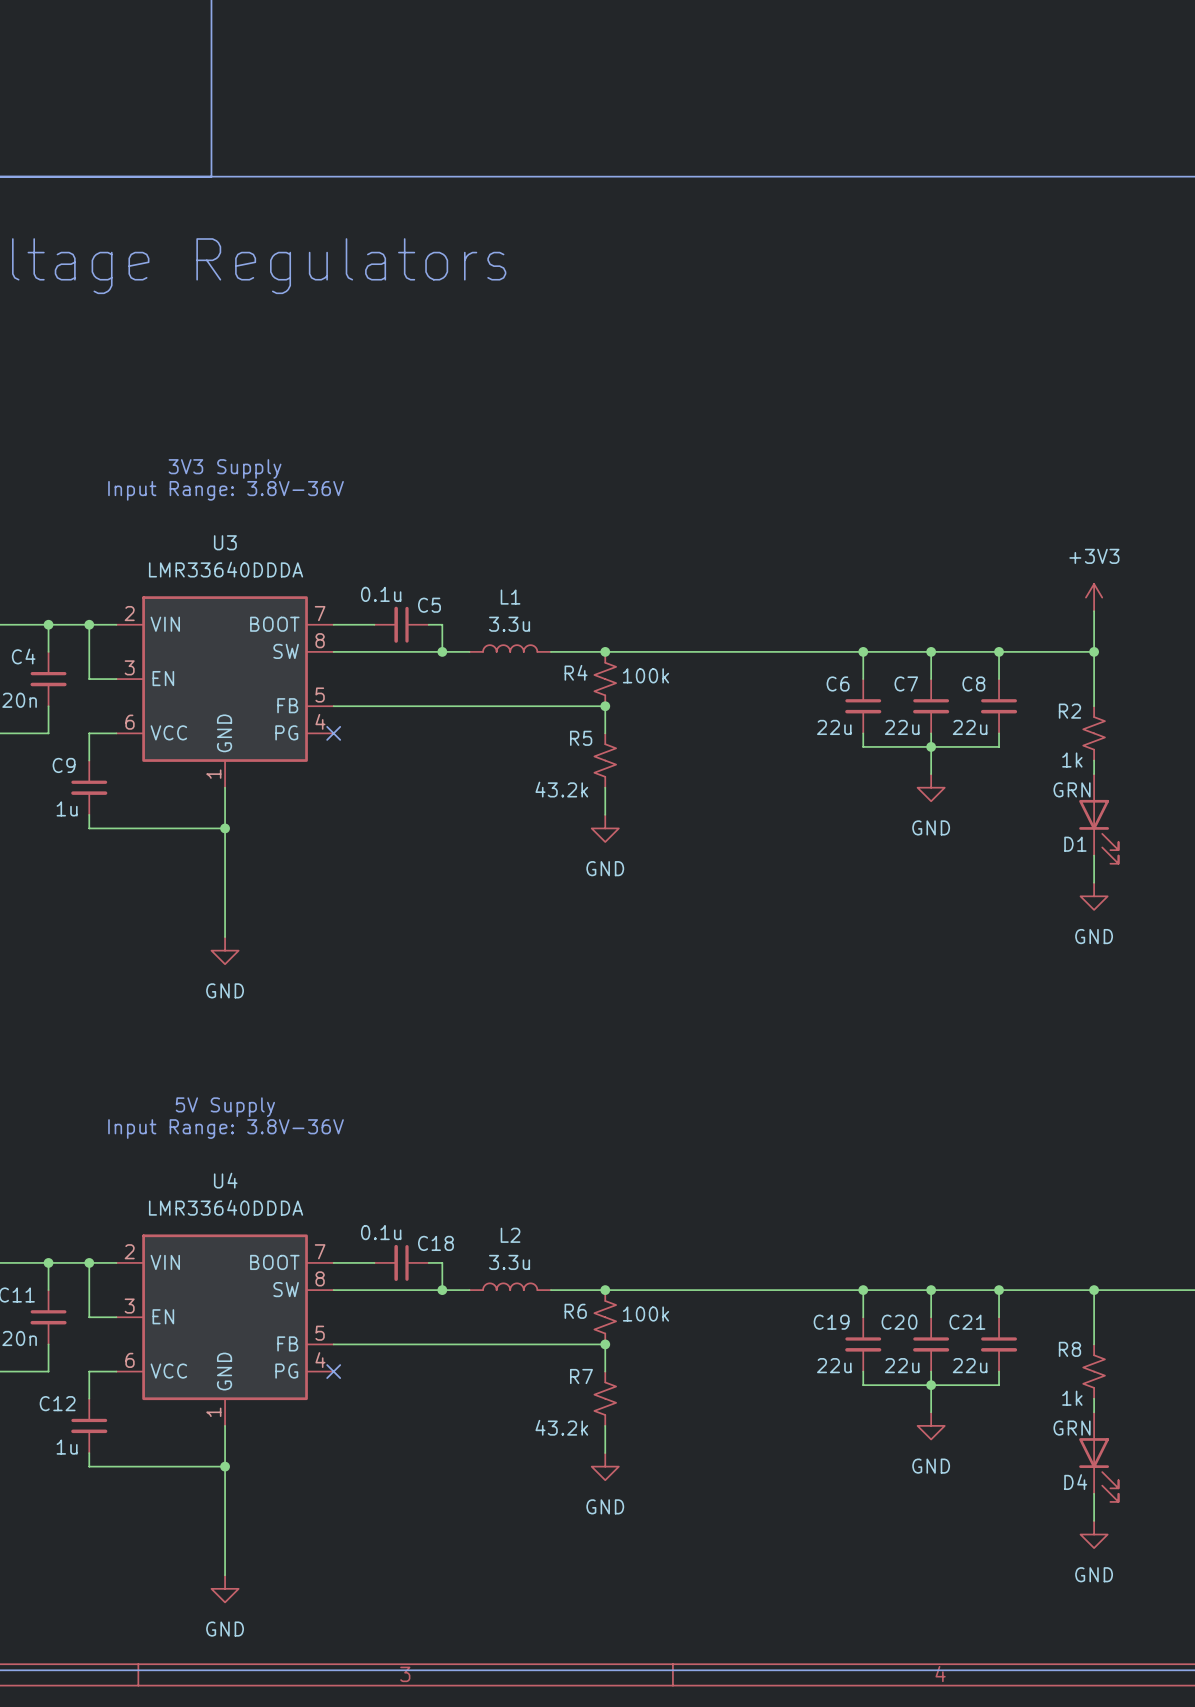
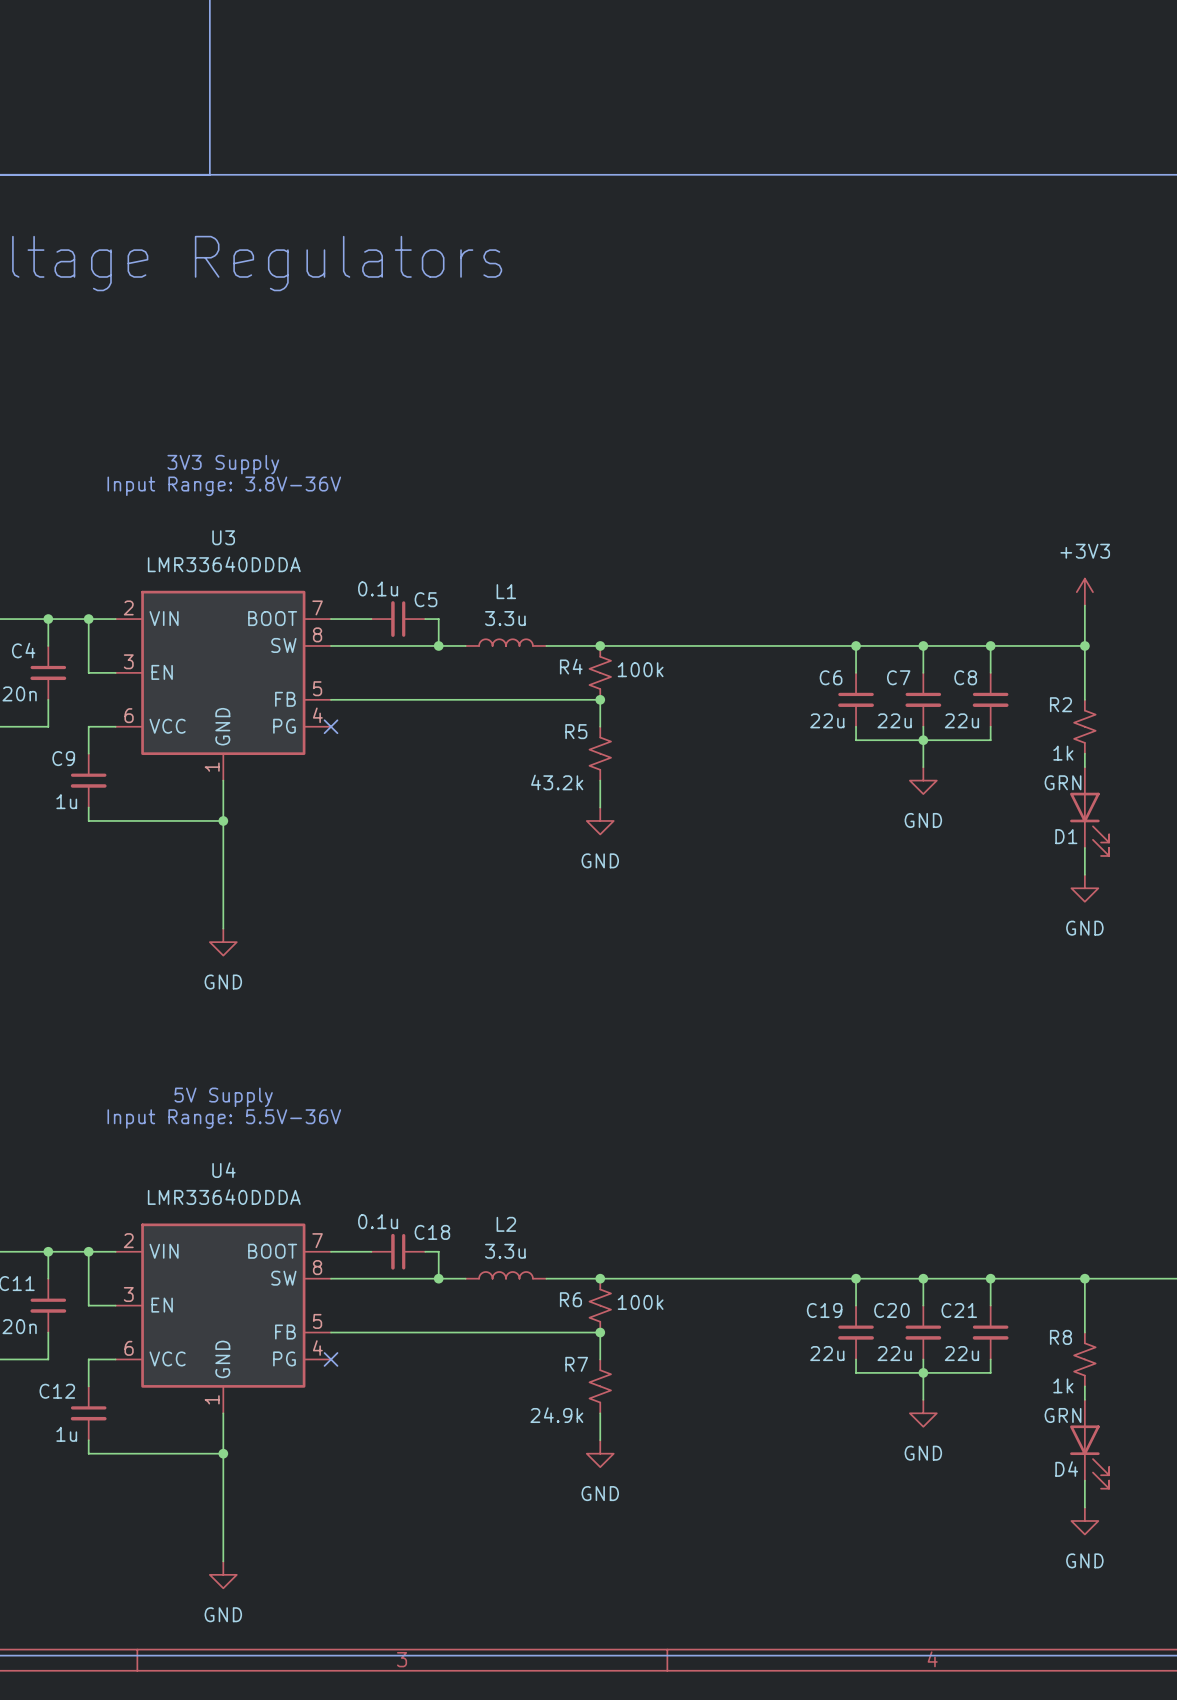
text: Input Range: 3.8V-36V (226, 1129) -> Input Range: 5.5V-36V (224, 1118)
R7 value: 43.2k (561, 1427) -> 24.9k (556, 1415)

